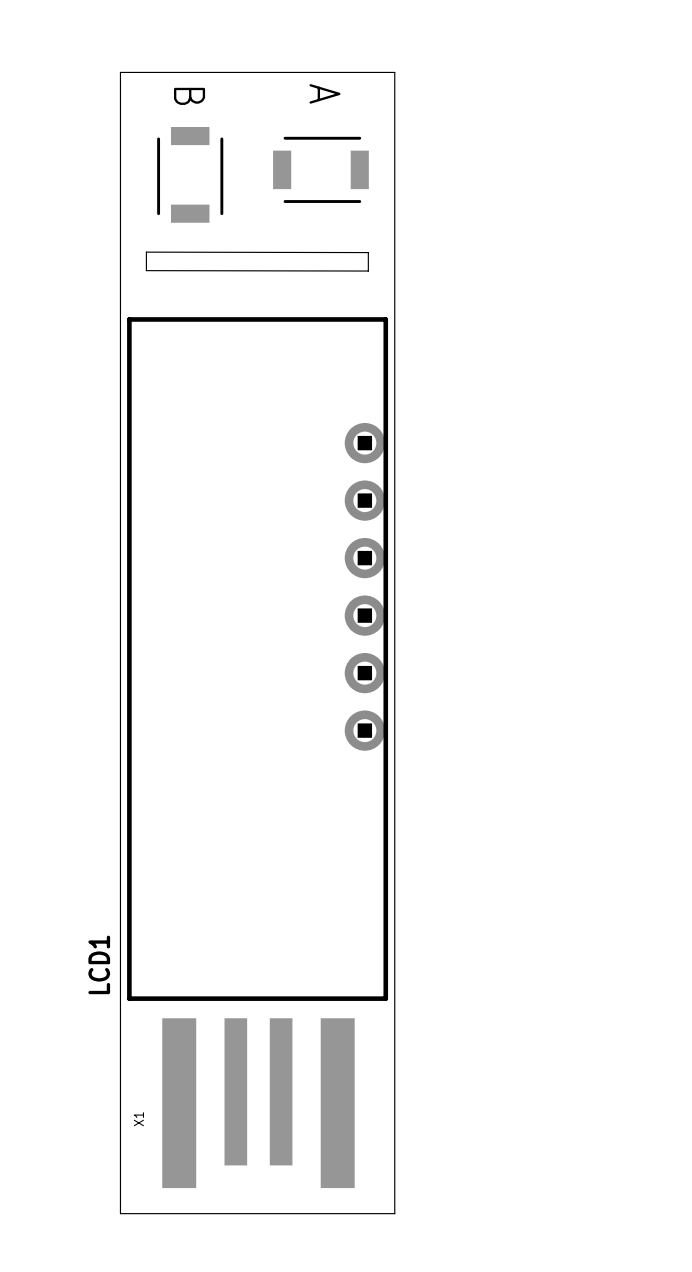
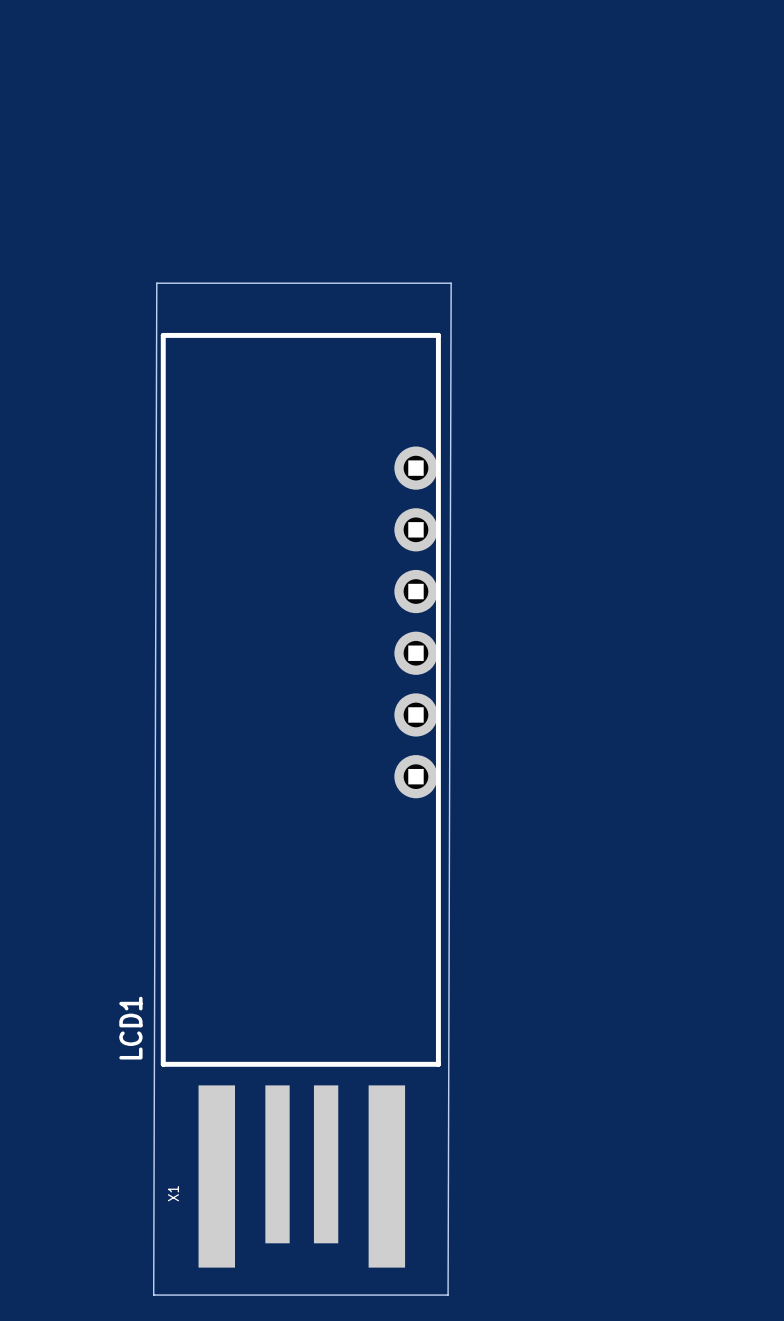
text: A (324, 93) -> none
text: B (189, 96) -> none
part: (320, 169) -> none
part: (190, 174) -> none
board edge: (146, 270) (146, 252) (368, 252) (368, 271) (146, 270) -> none
board edge: (120, 1213) (120, 72) (394, 72) (394, 1213) -> (153, 1295) (156, 283) (451, 283) (448, 1295)

